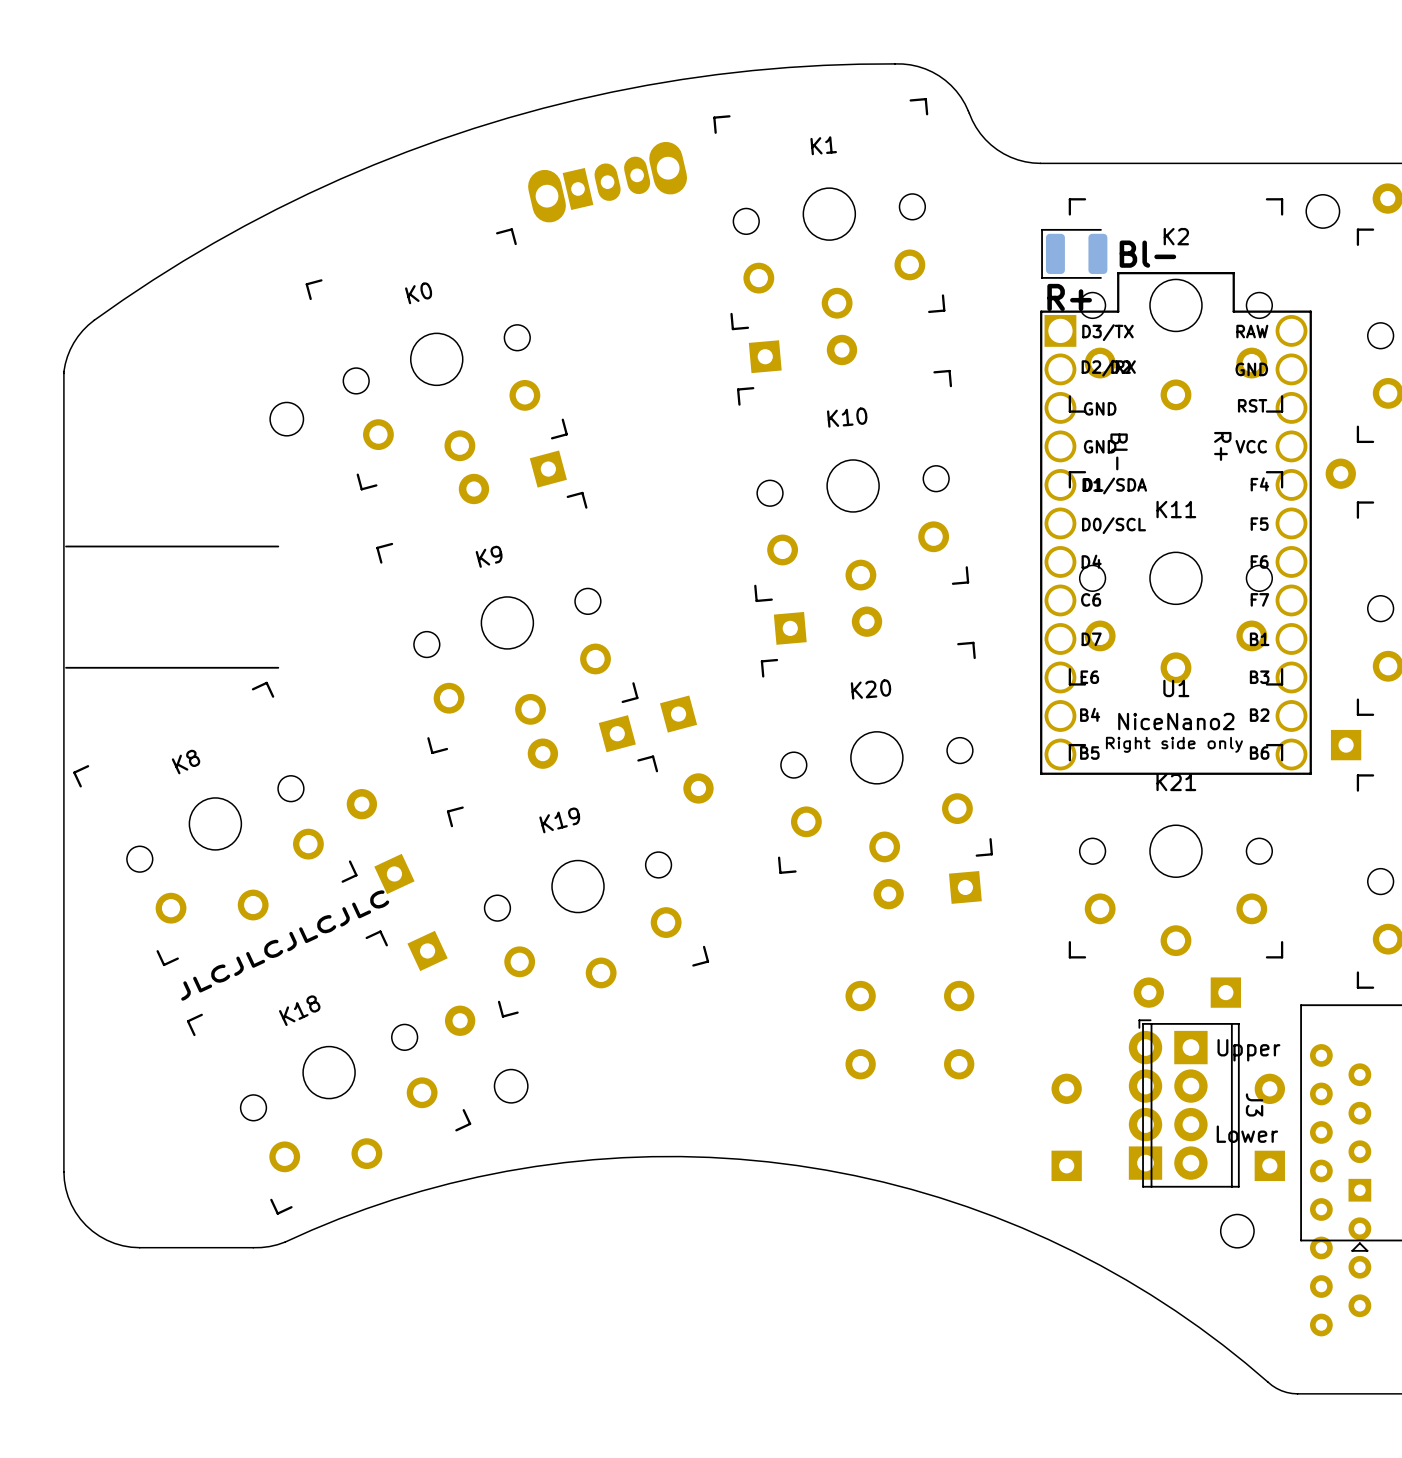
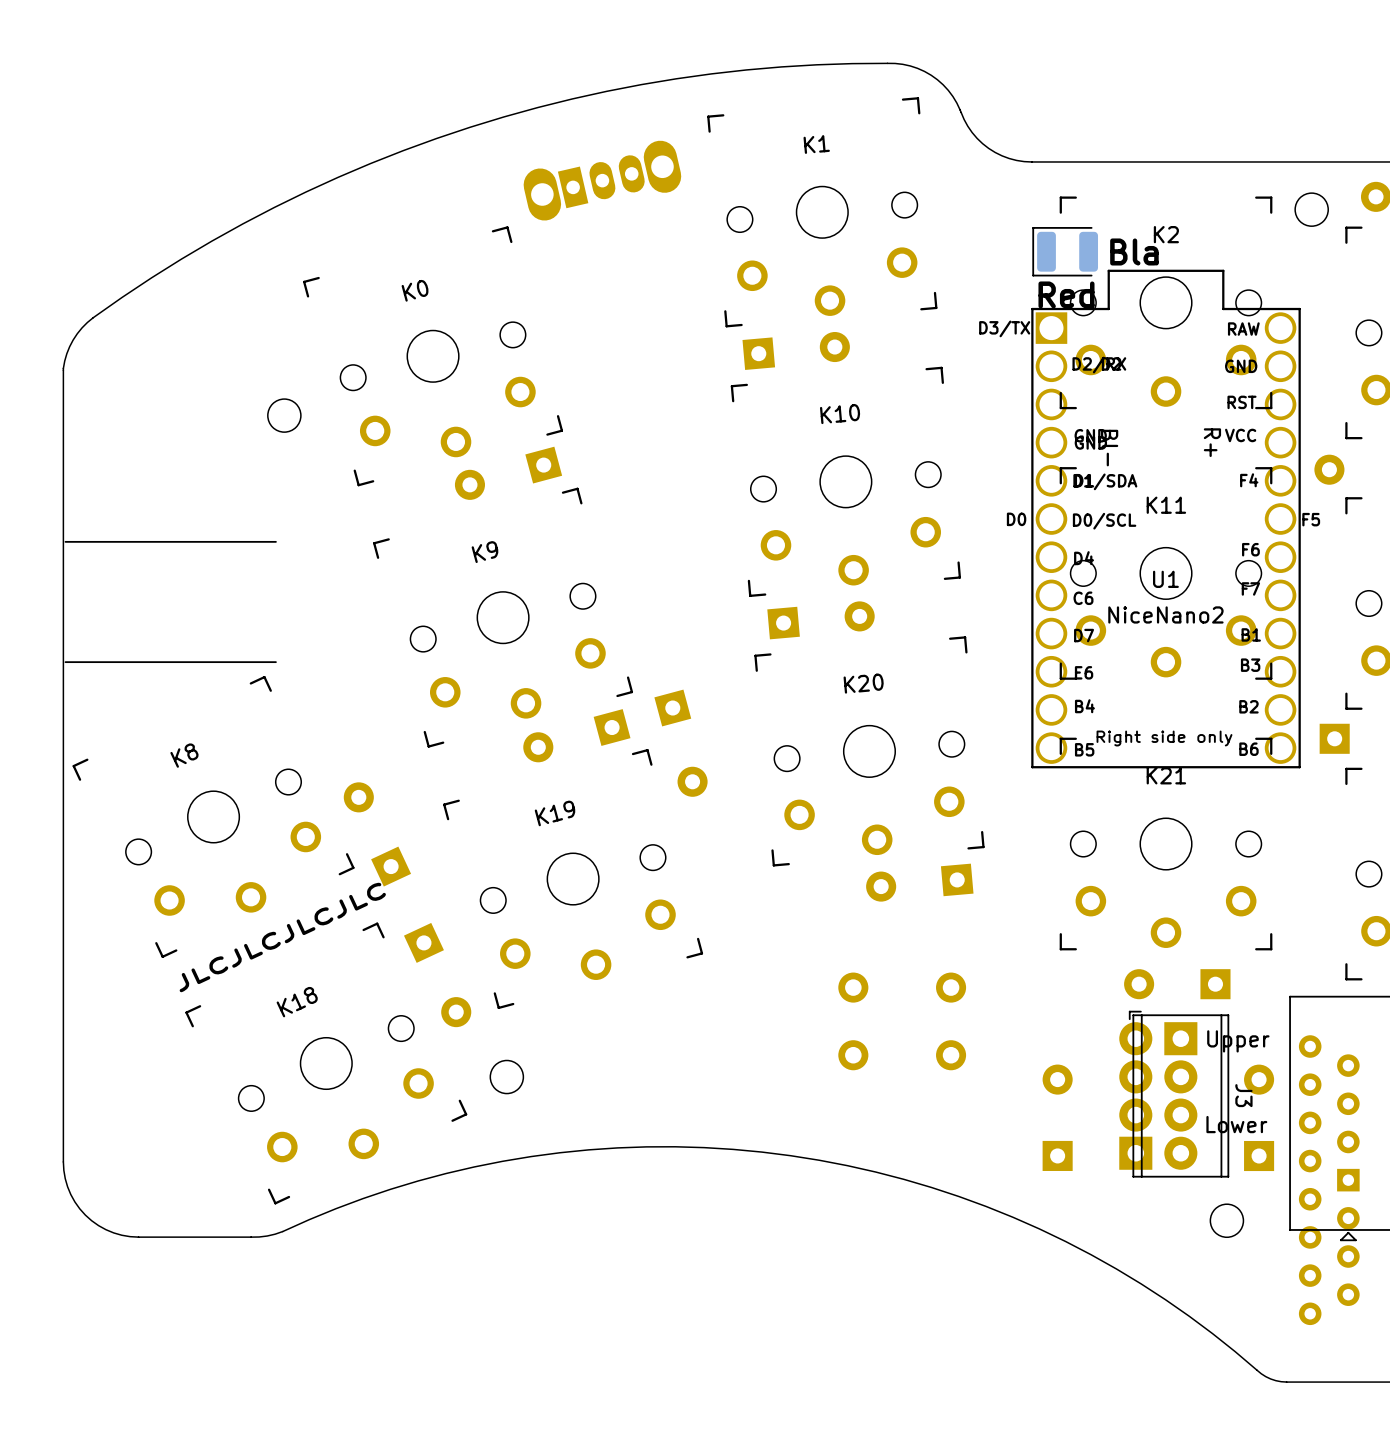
text: Bl- (1147, 254) -> Bla (1134, 251)
U1 footprint: [1040, 272, 1312, 775] -> [1031, 269, 1301, 769]
text: R+ (1069, 297) -> Red (1066, 294)
U1 name position: U1 (1176, 688) -> U1 (1165, 579)
U1 value position: NiceNano2 (1176, 721) -> NiceNano2 (1165, 614)

